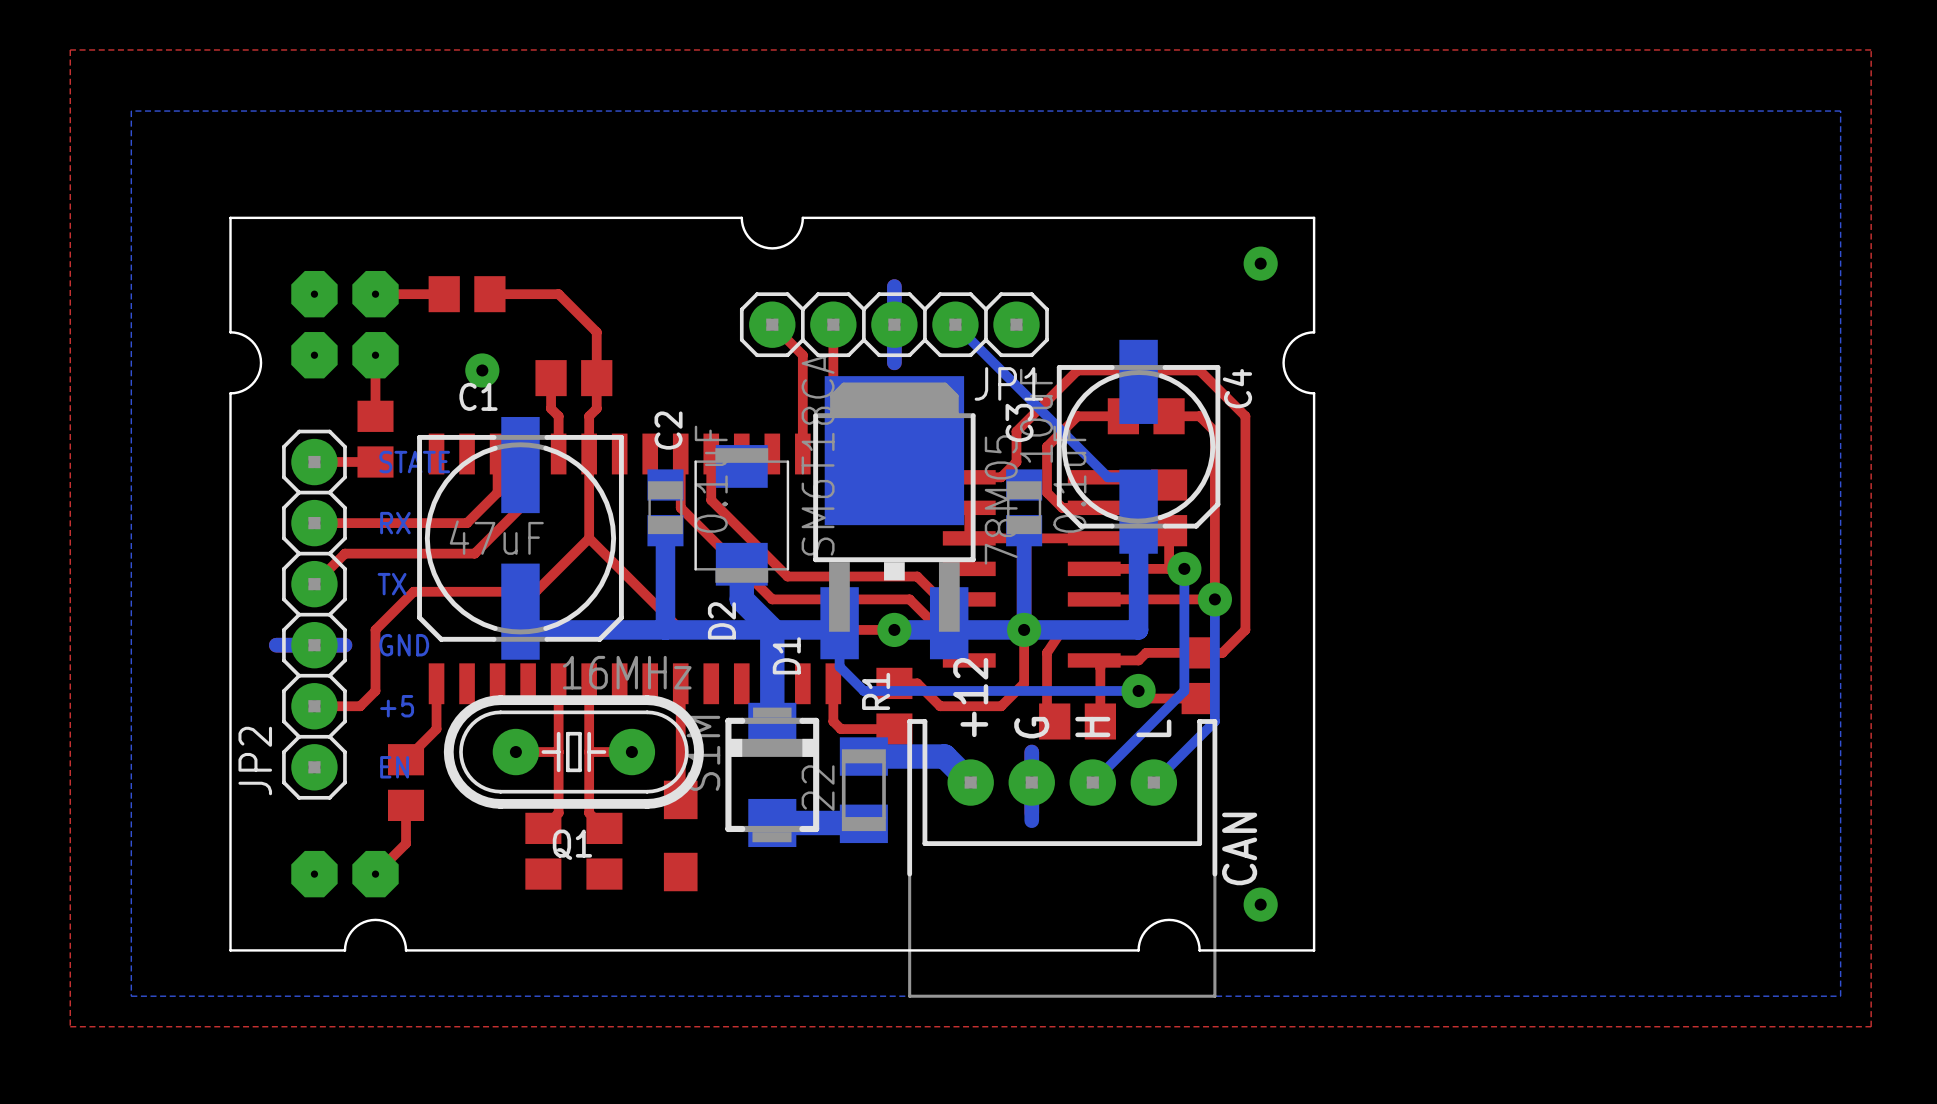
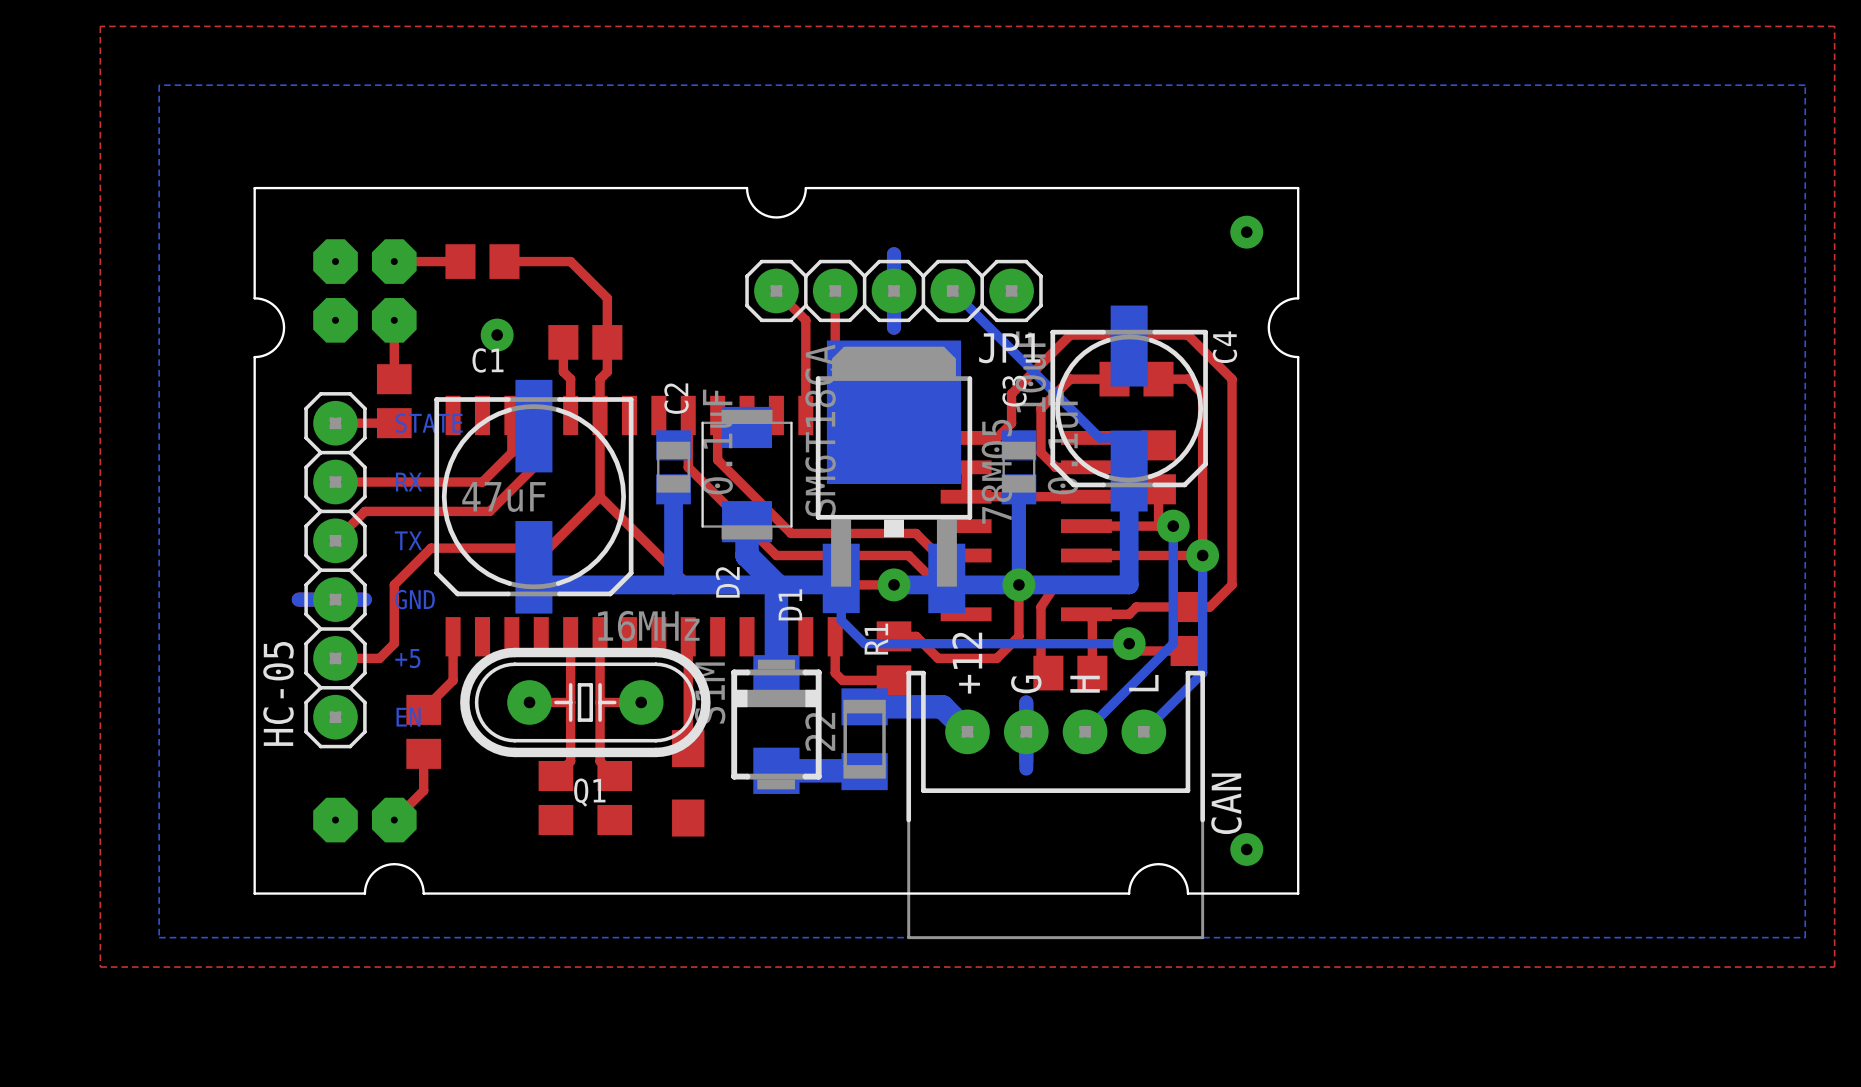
JP2 name: JP2 (255, 761) -> HC-05 (278, 693)

